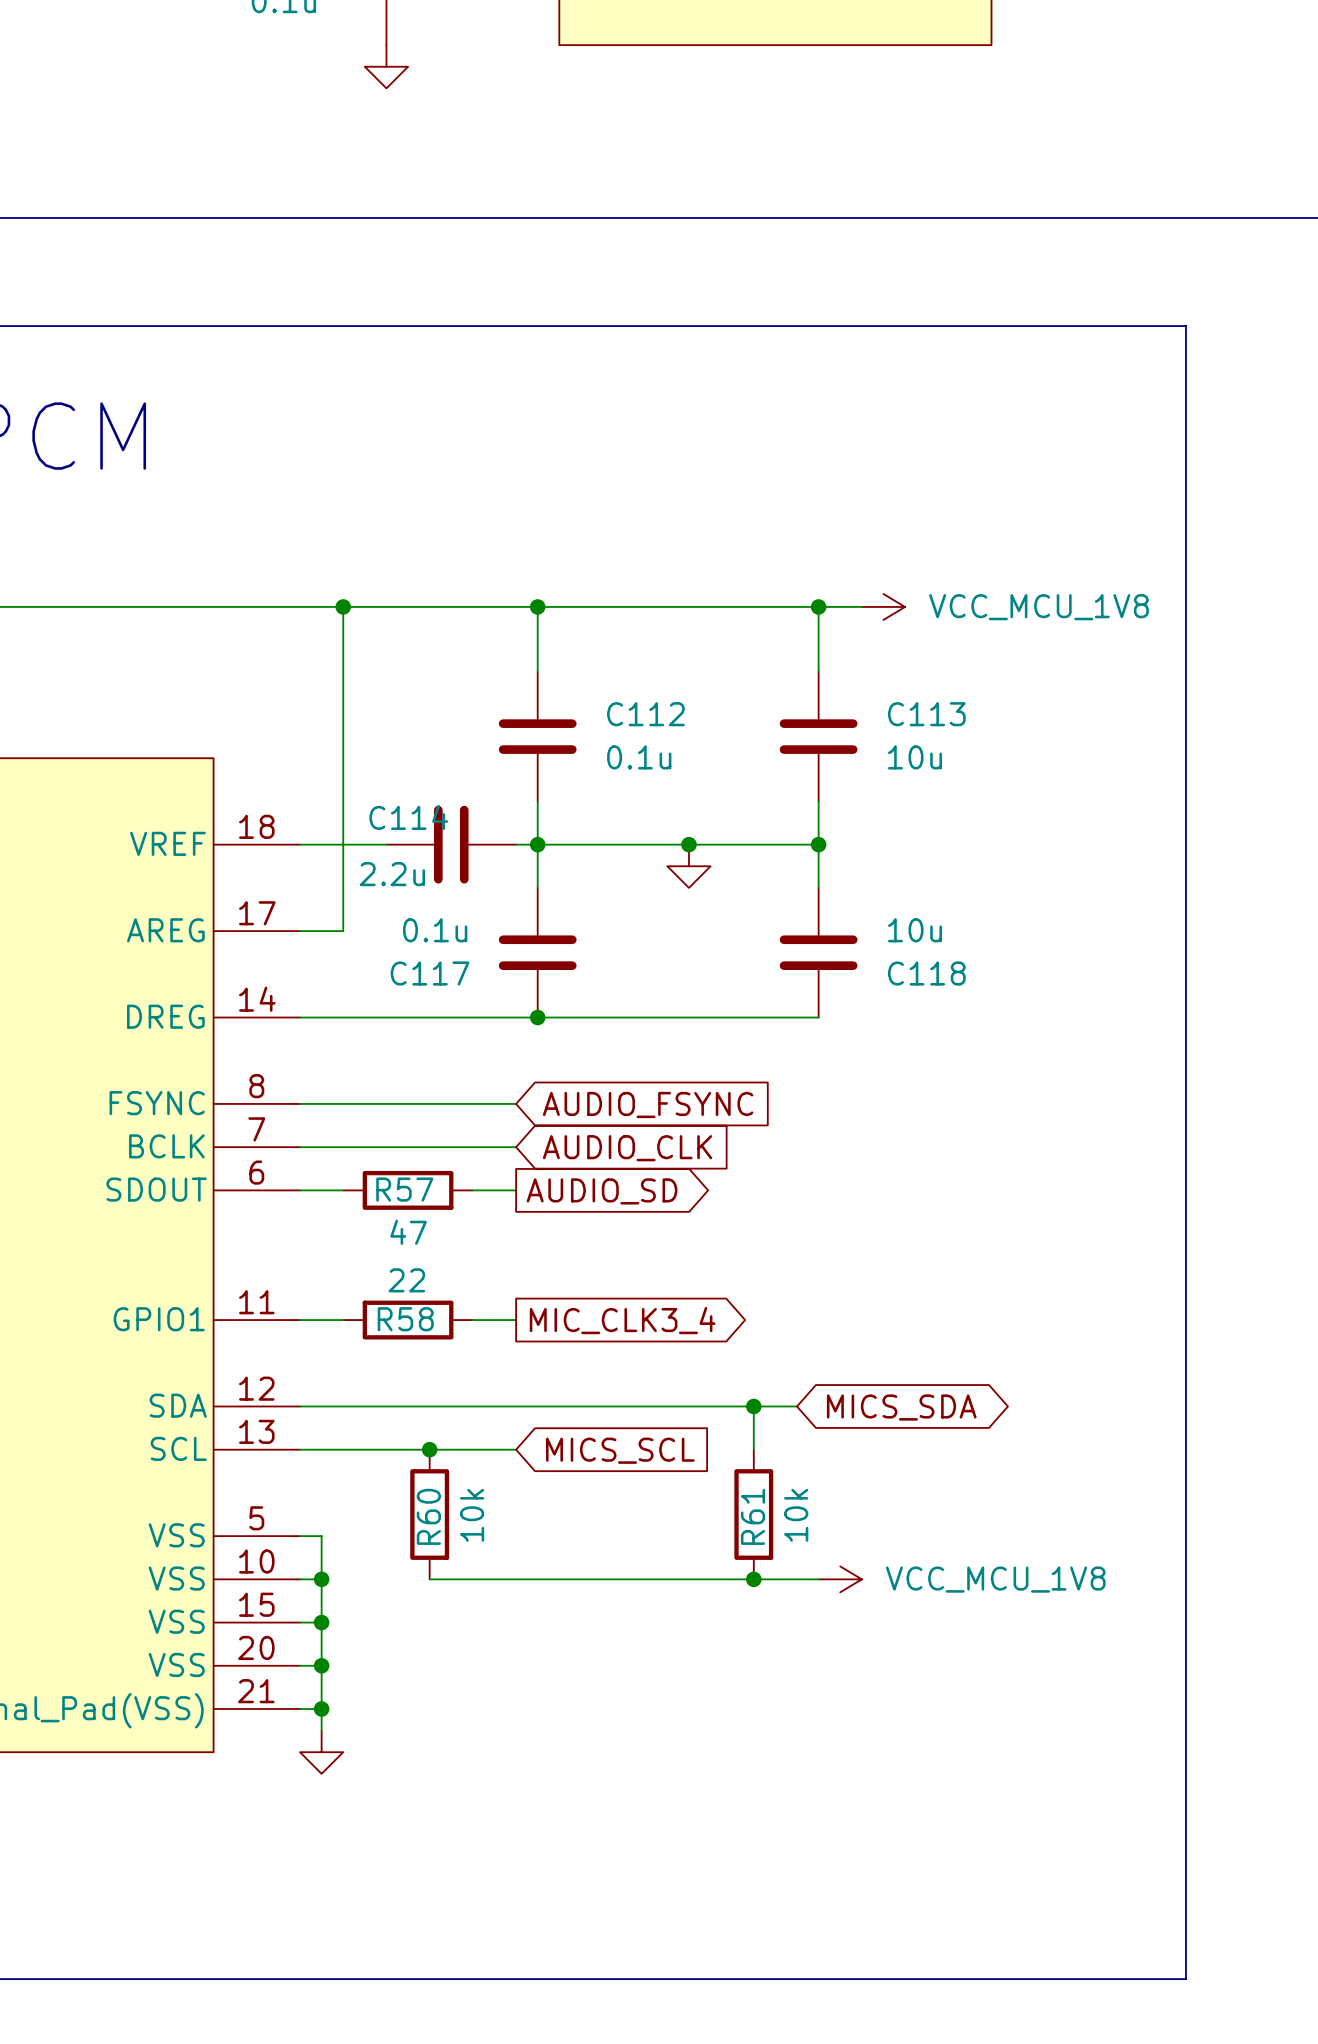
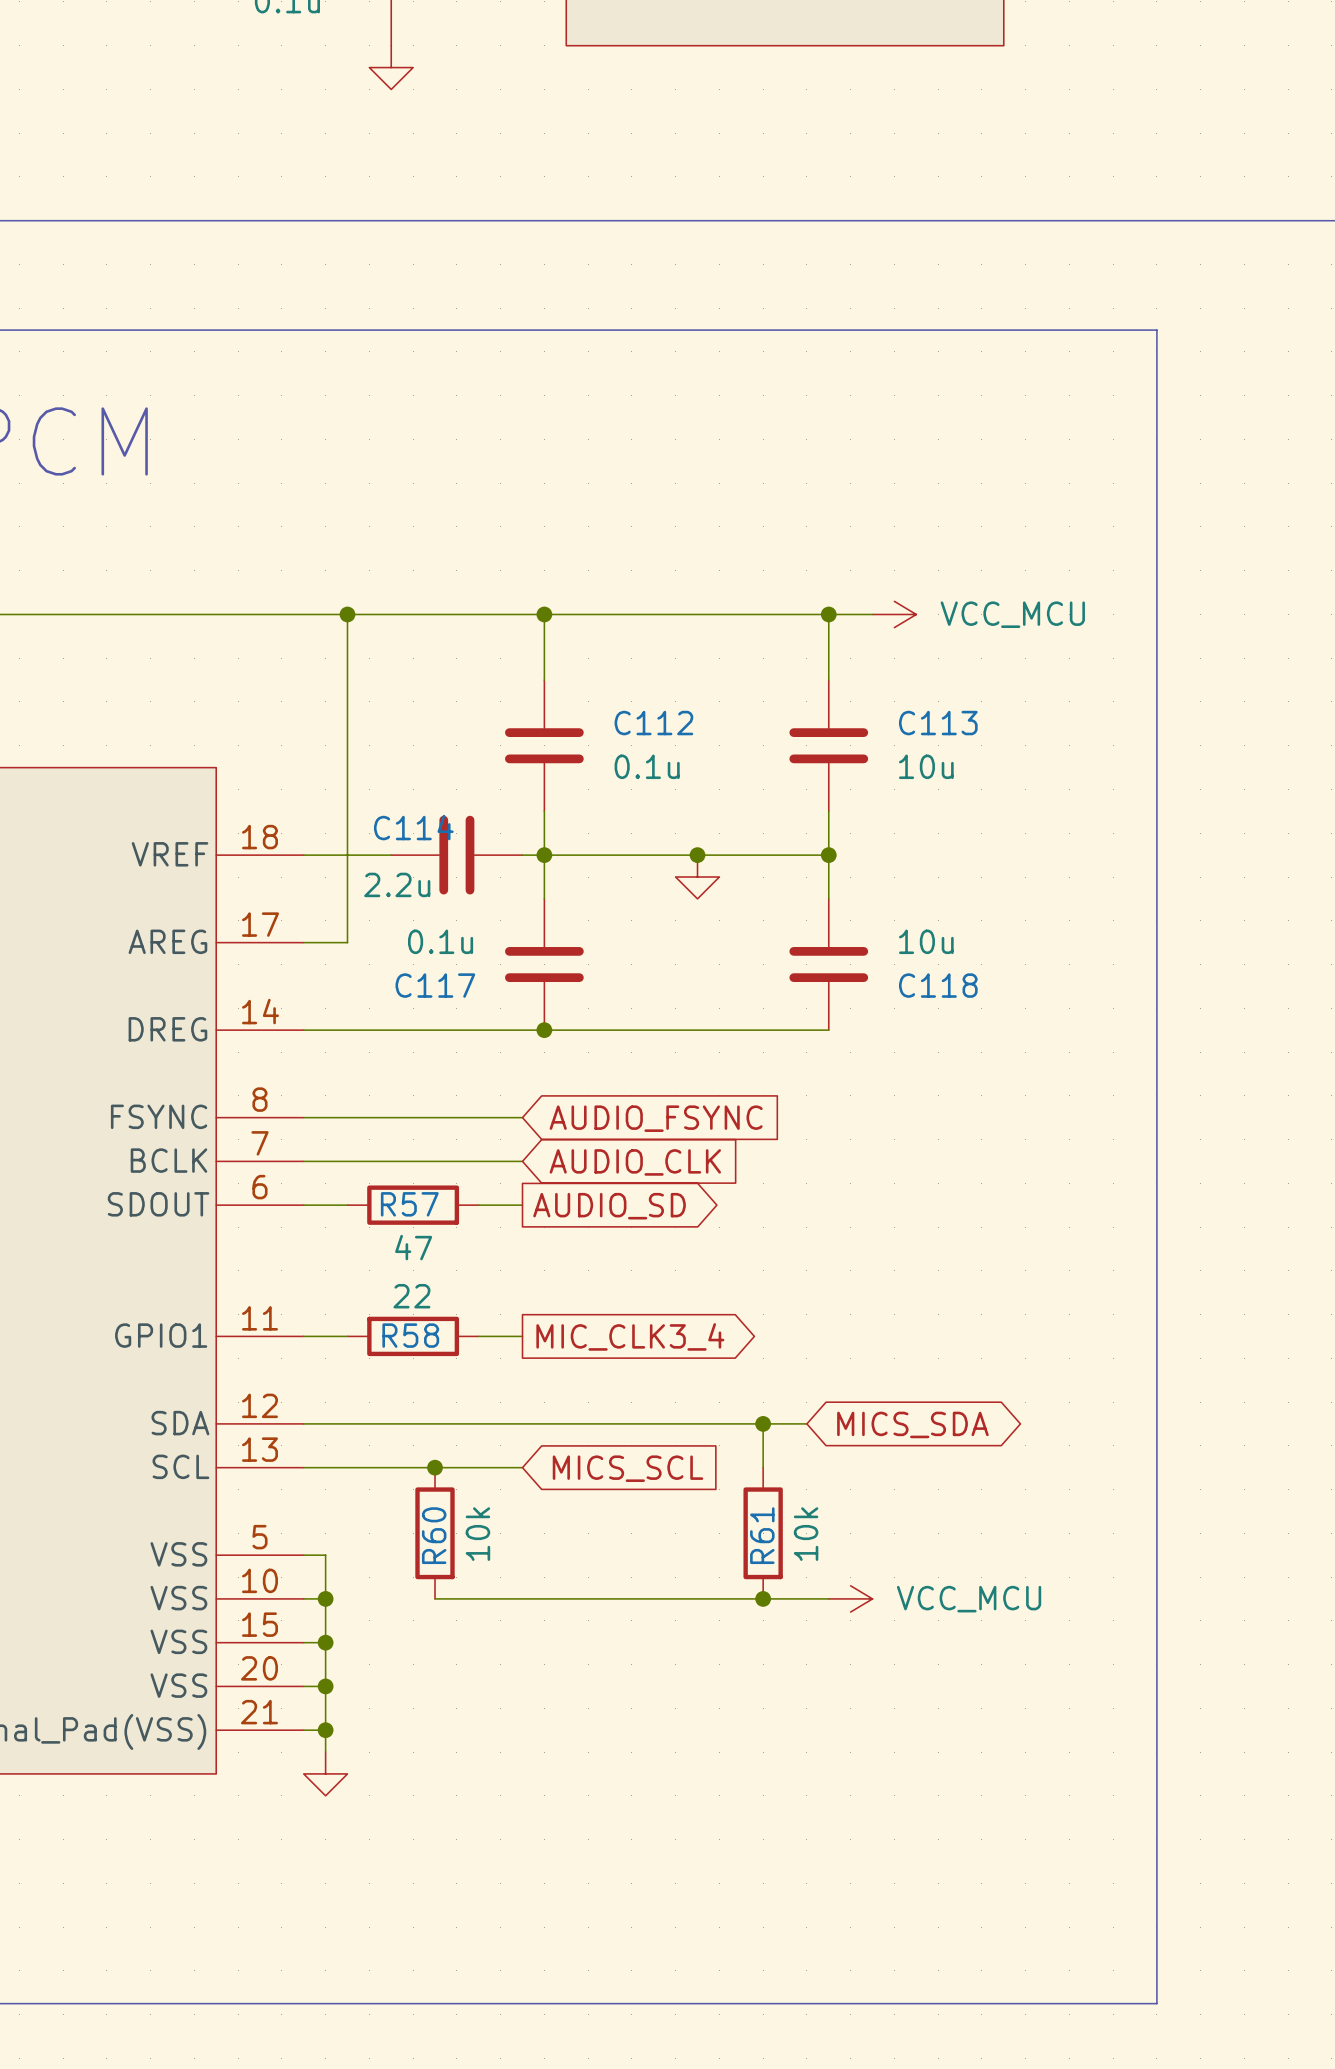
line: (1142, 326) (1185, 326) (1185, 1979) (1142, 1979) -> (1156, 330) (1156, 2003)
power symbol: VCC_MCU_1V8 (883, 606) -> VCC_MCU (894, 614)
power symbol: VCC_MCU_1V8 (840, 1579) -> VCC_MCU (850, 1598)

